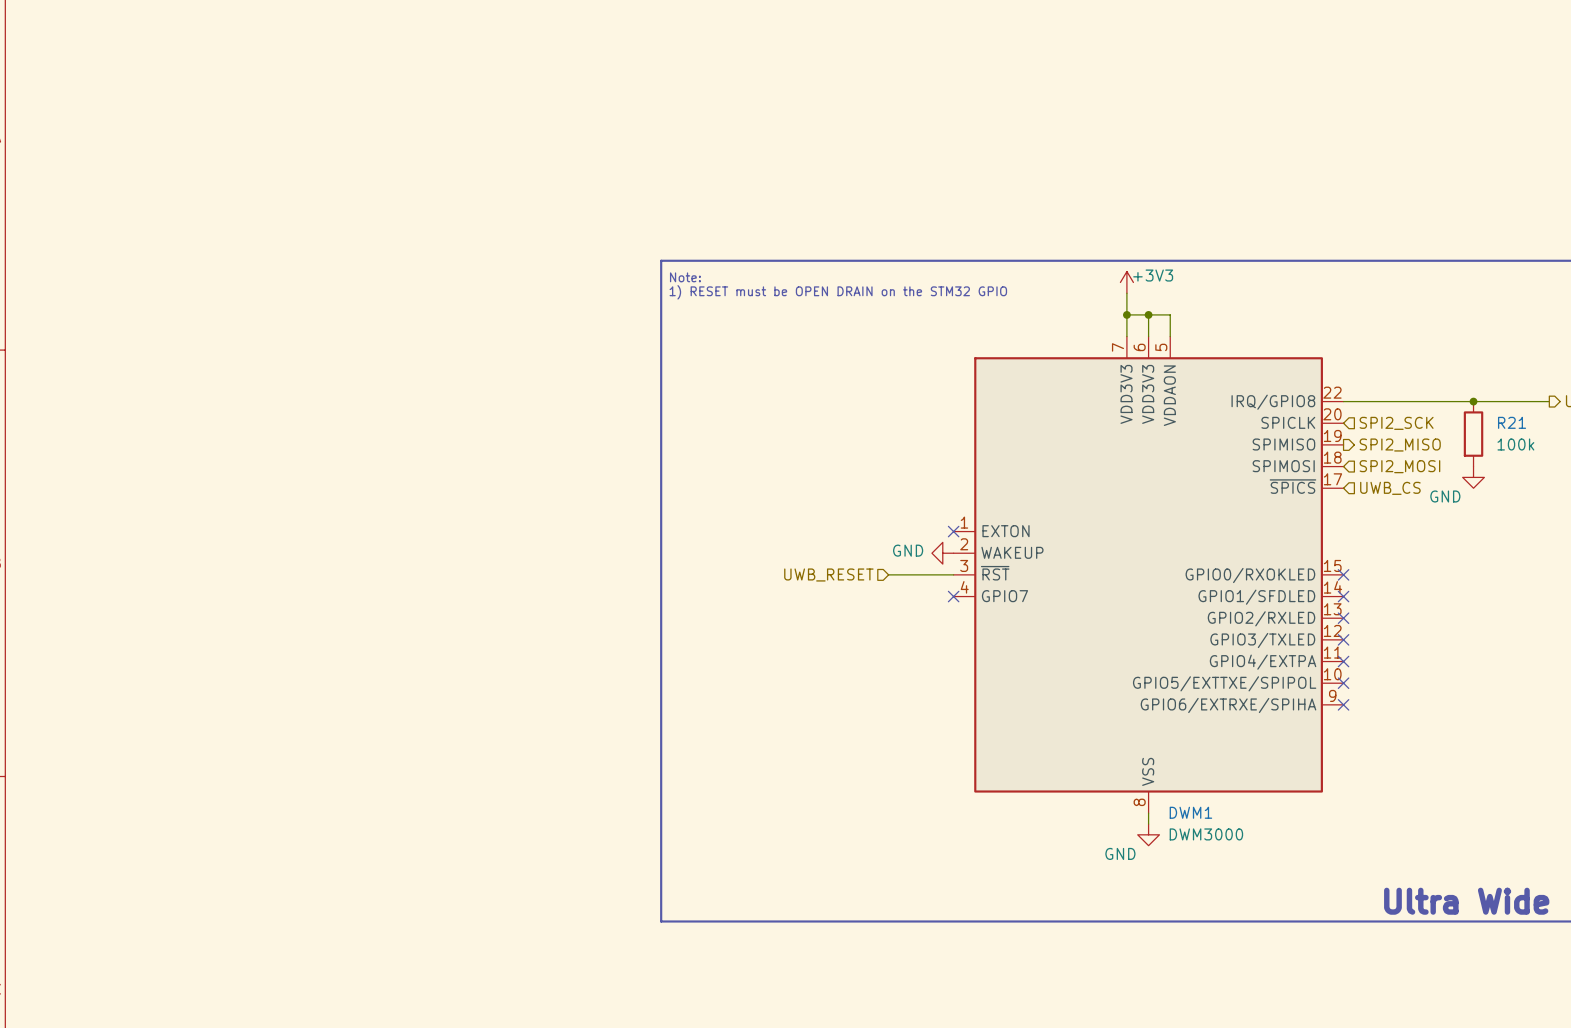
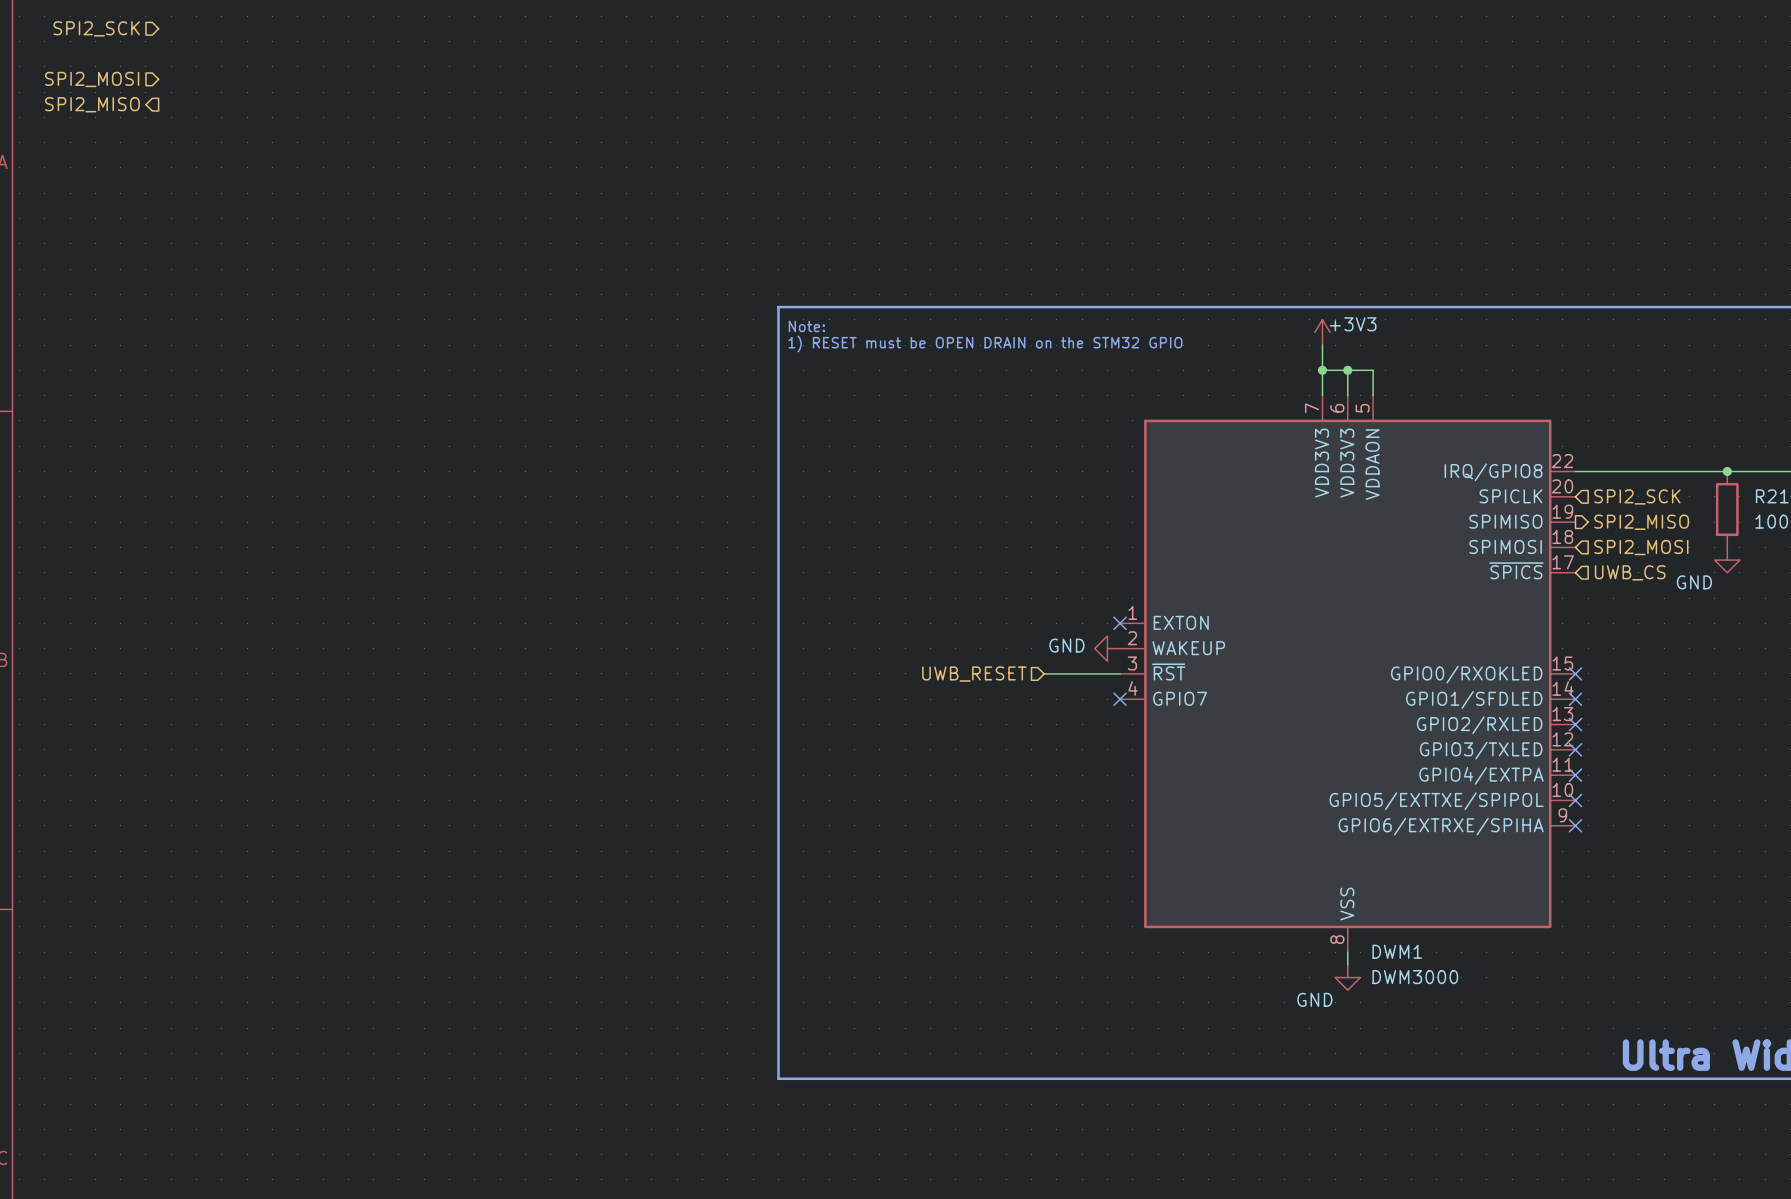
hierarchical label: none -> SPI2_SCK (96, 28)
hierarchical label: none -> SPI2_MOSI (92, 79)
hierarchical label: none -> SPI2_MISO (92, 104)

